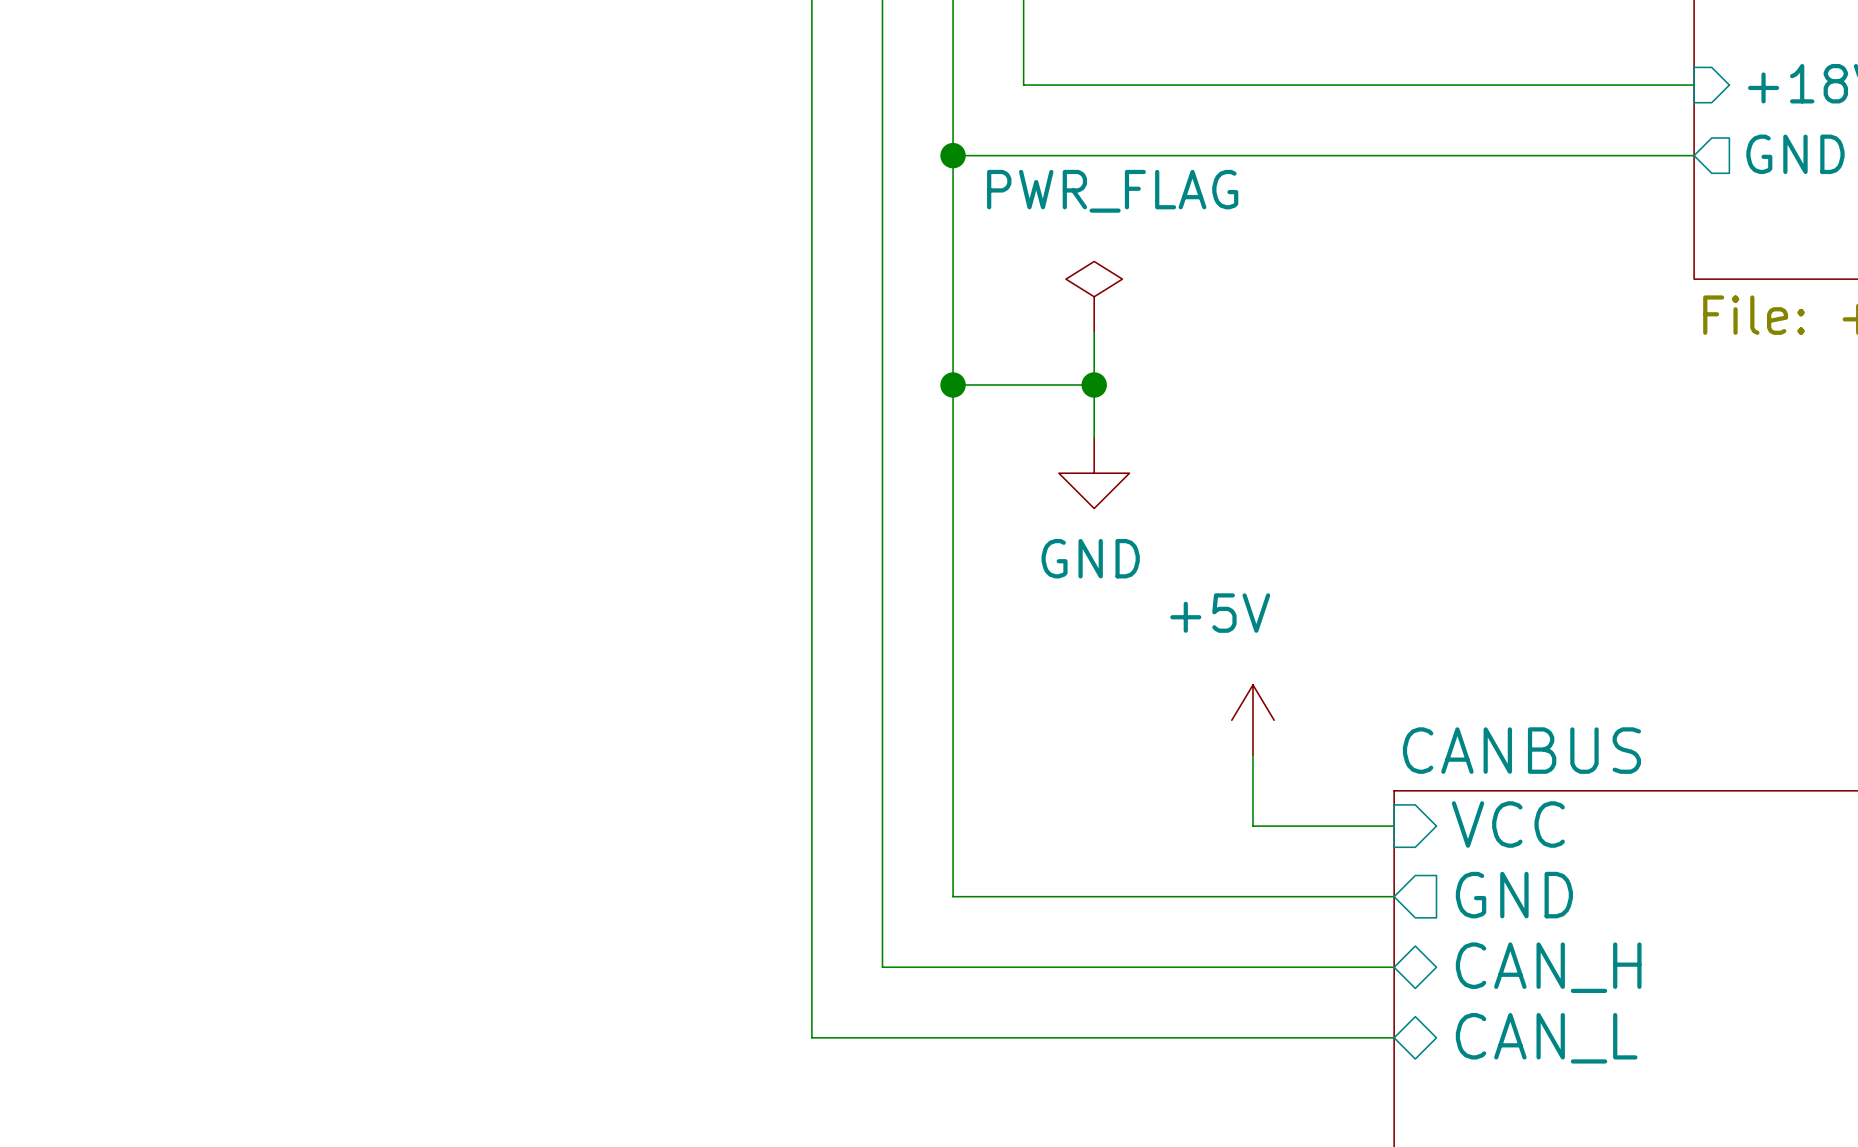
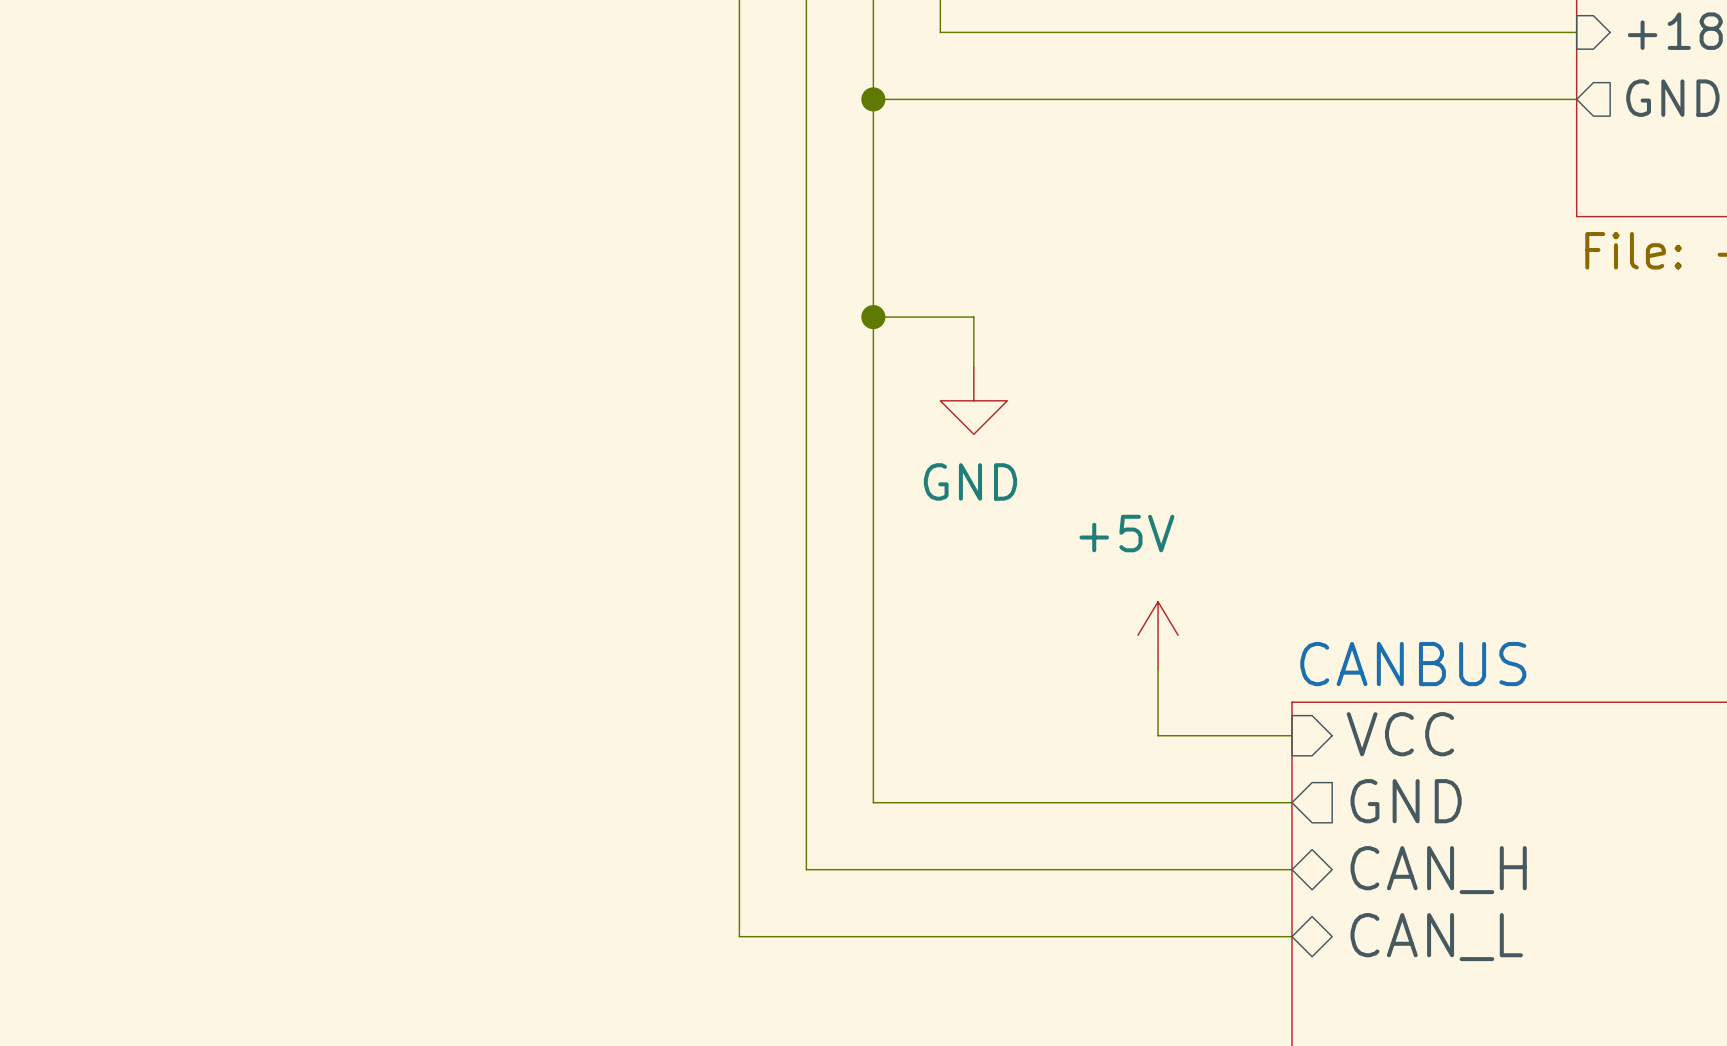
power symbol: PWR_FLAG (1094, 296) -> none
wire: (1094, 332) (1094, 437) -> none
wire: (1058, 385) (1094, 385) -> (973, 317) (973, 367)
junction: (1094, 385) -> none
power symbol position: GND (1094, 473) -> GND (973, 400)

